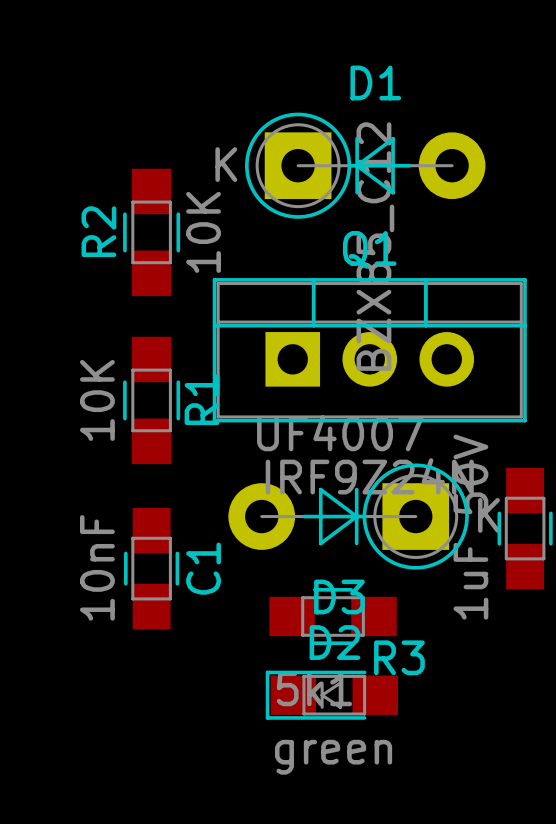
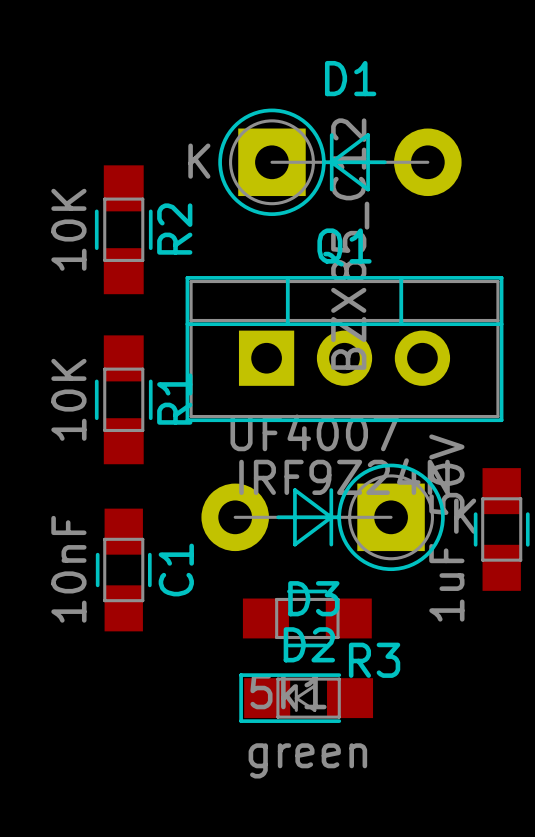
R2 name position: R2 (98, 231) -> R2 (174, 229)
R2 value position: 10K (203, 232) -> 10K (68, 229)

